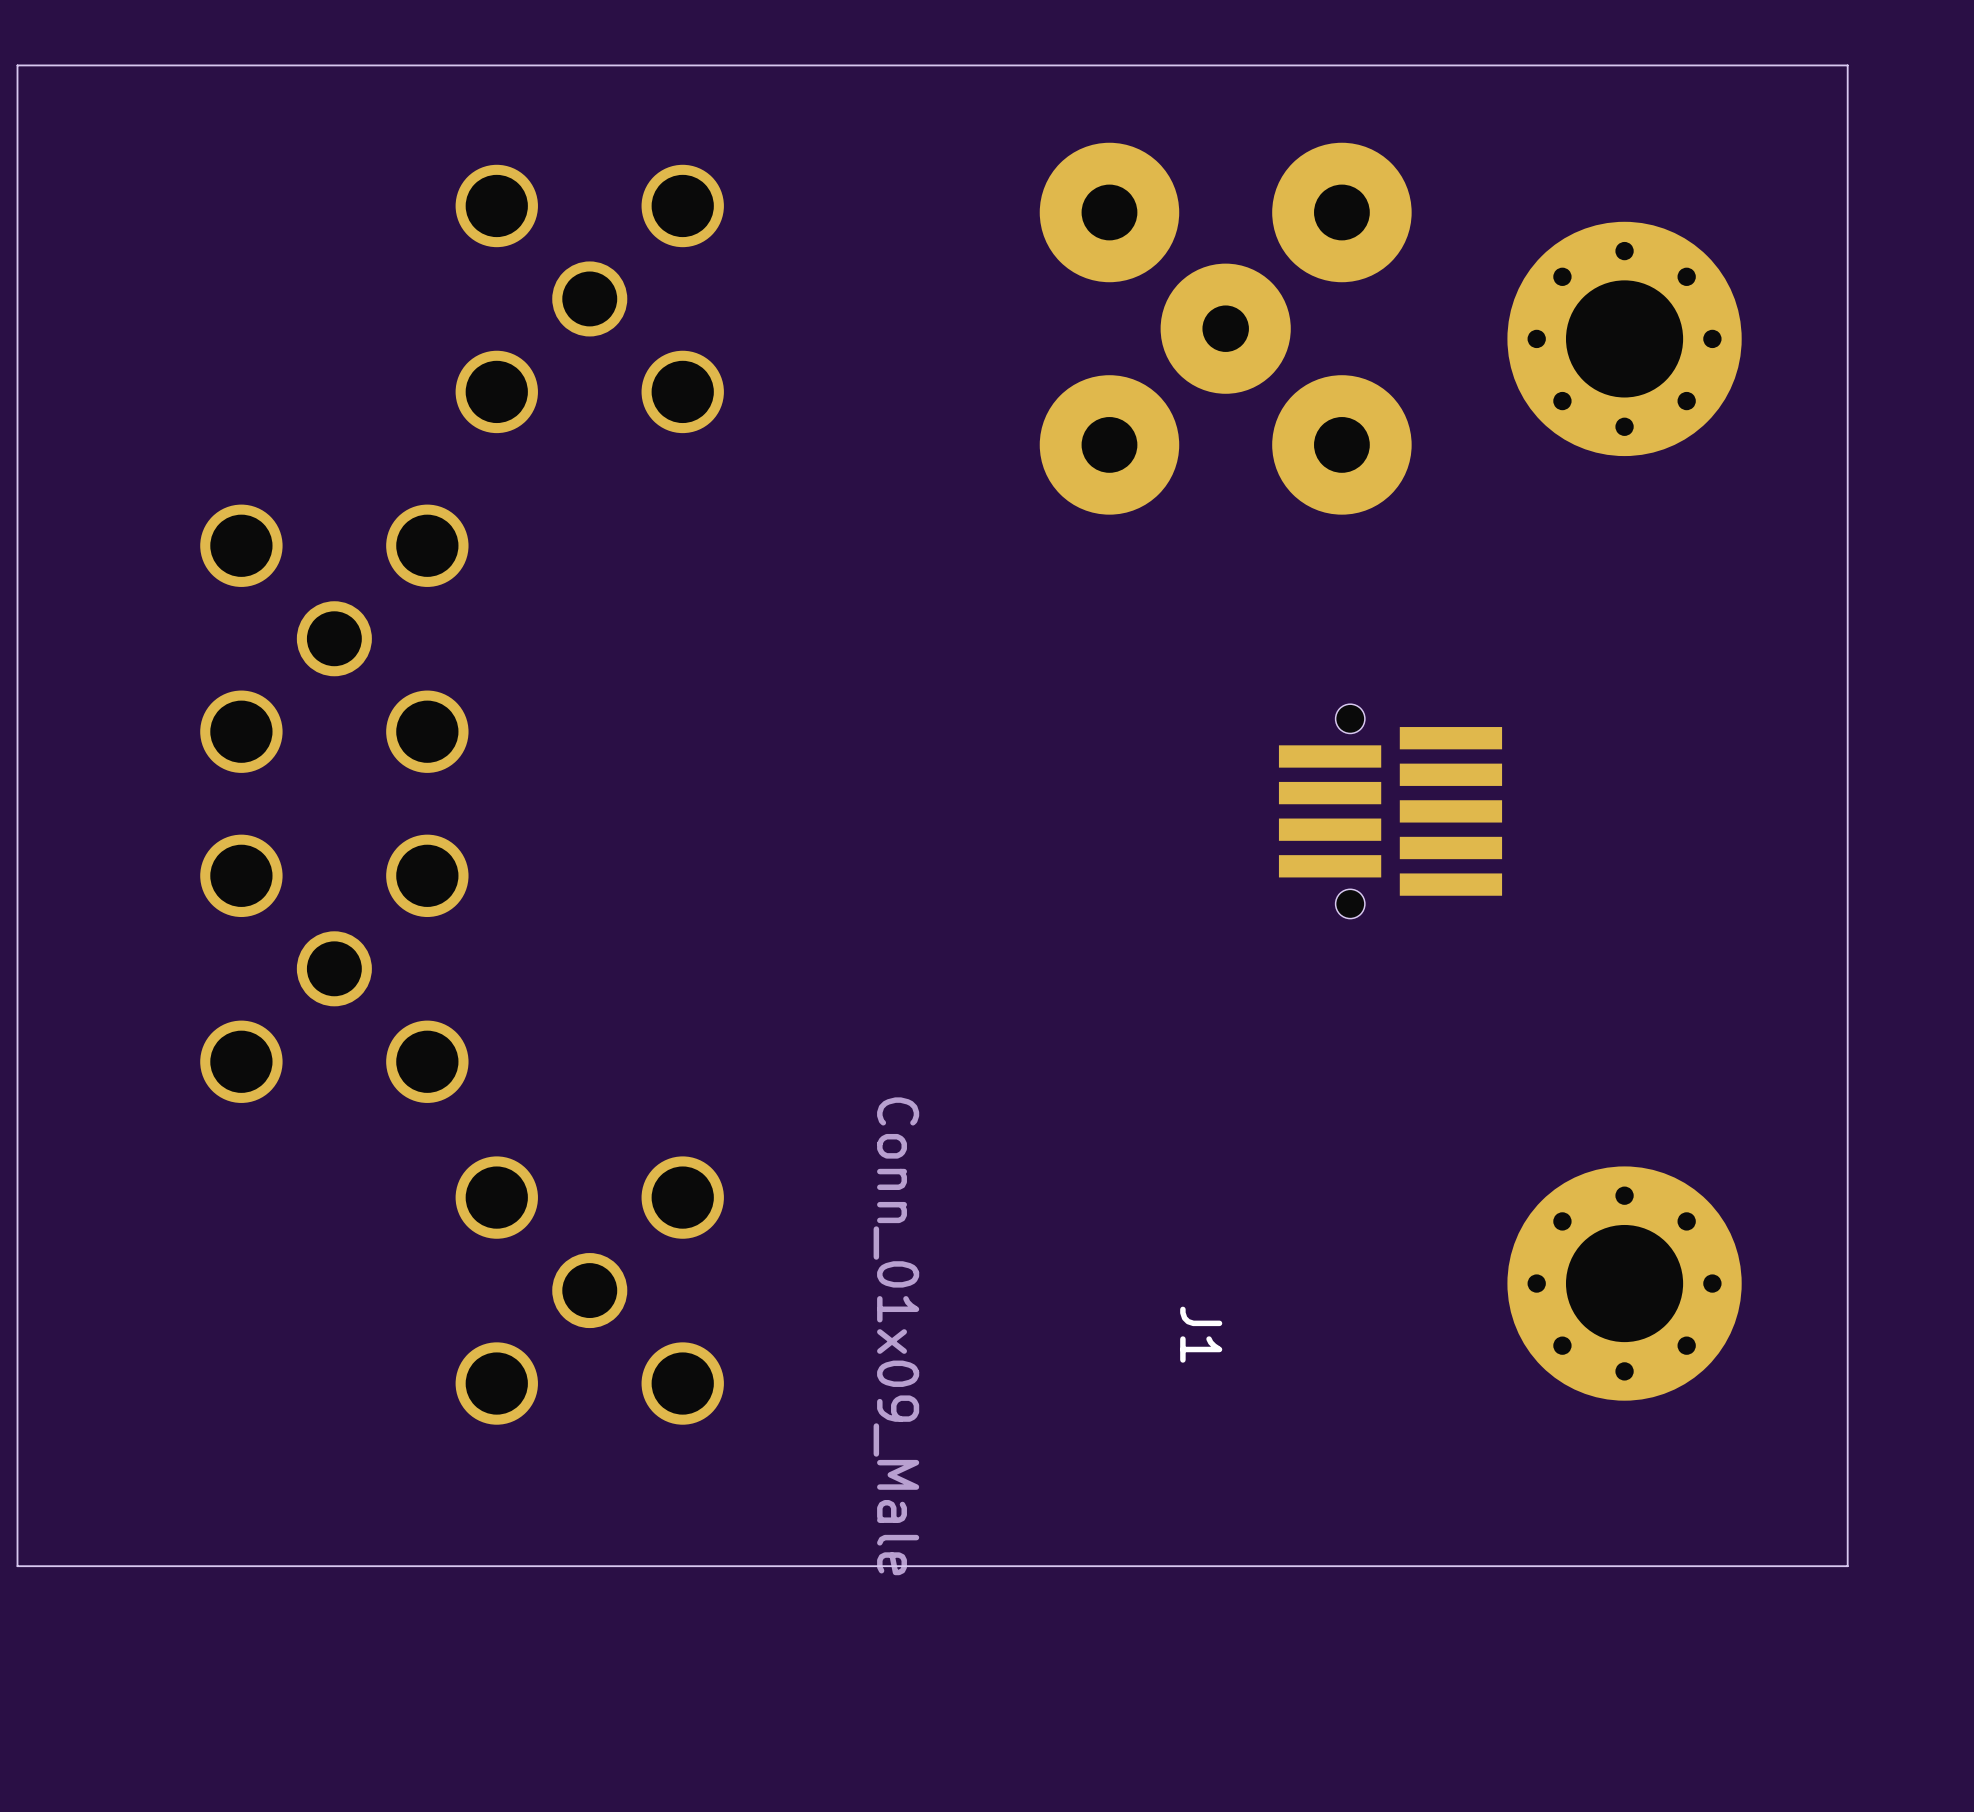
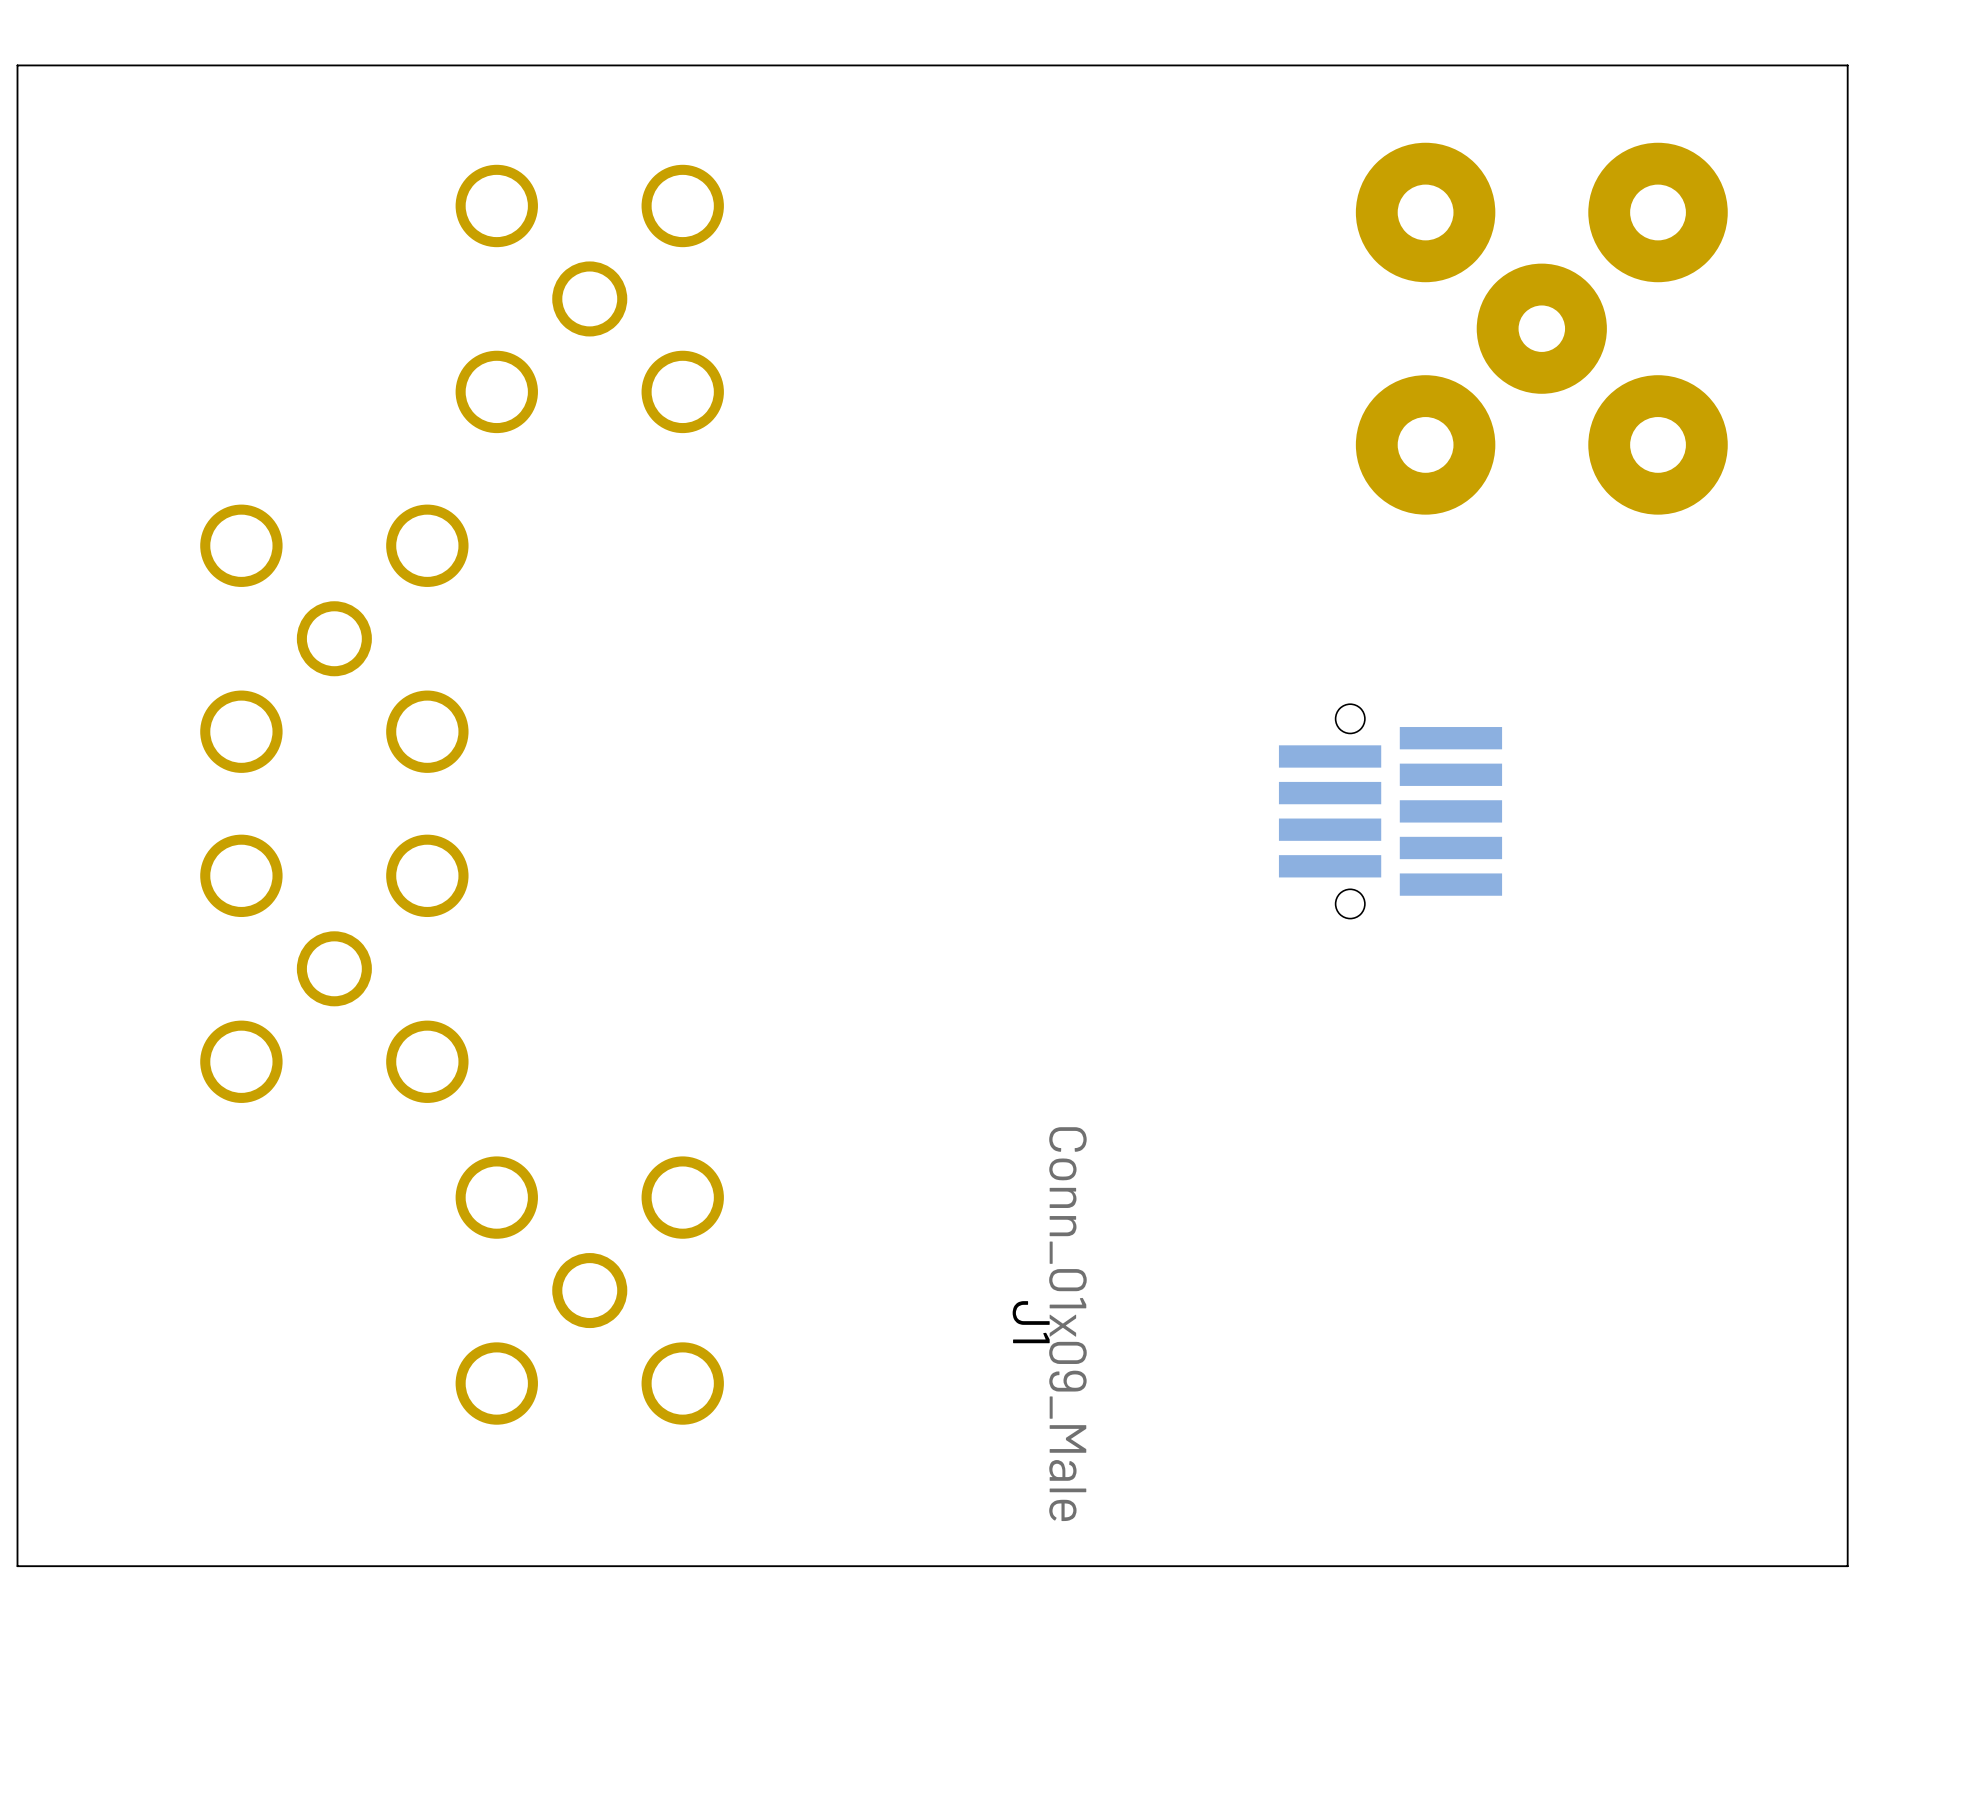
part position: (1225, 328) -> (1541, 328)
part: (1624, 338) -> none
part: (1624, 1283) -> none
J1 name position: J1 (1201, 1334) -> J1 (1031, 1322)
J1 value position: Conn_01x09_Male (896, 1336) -> Conn_01x09_Male (1067, 1324)

